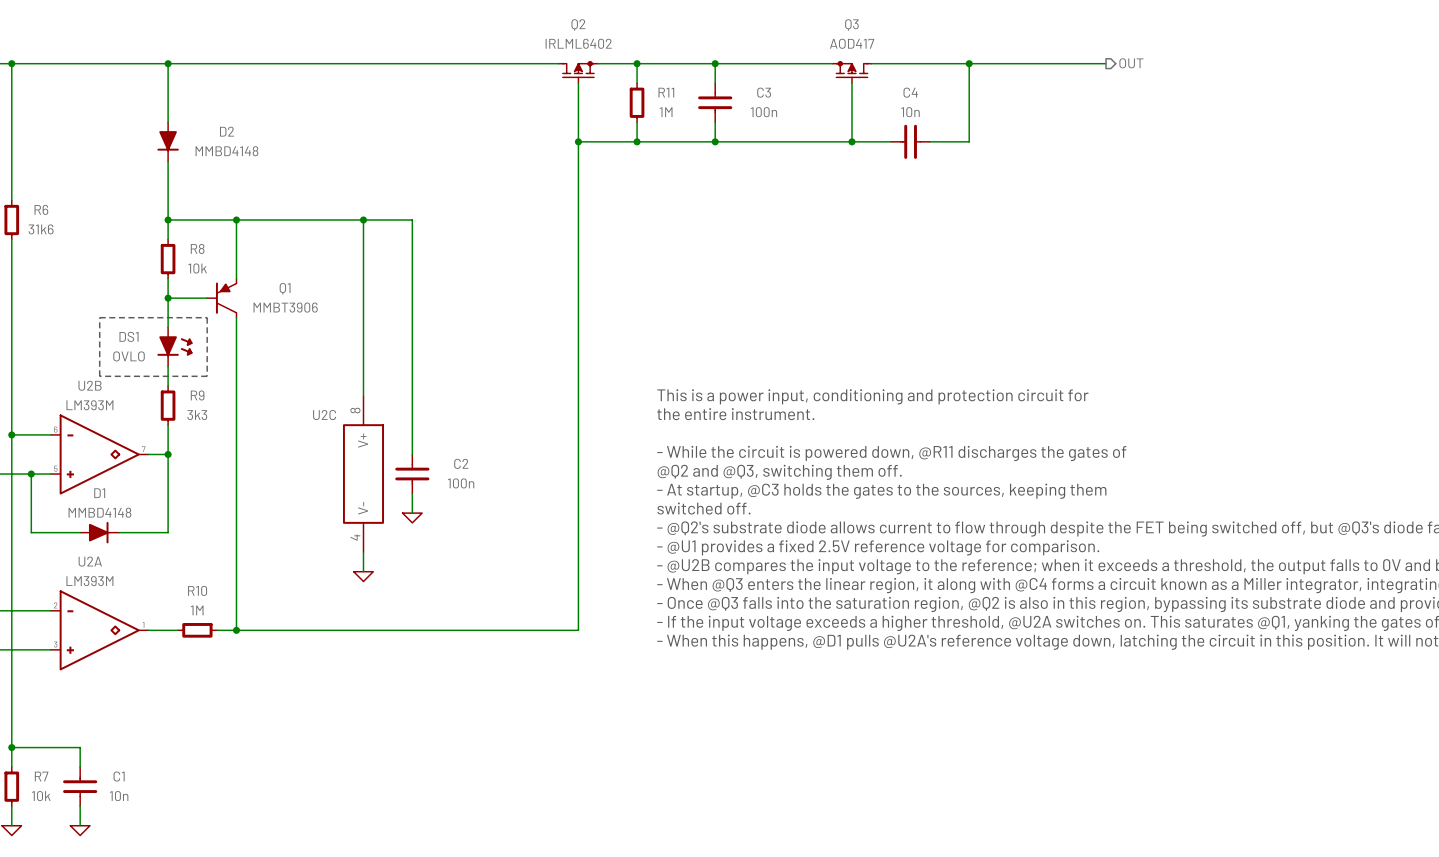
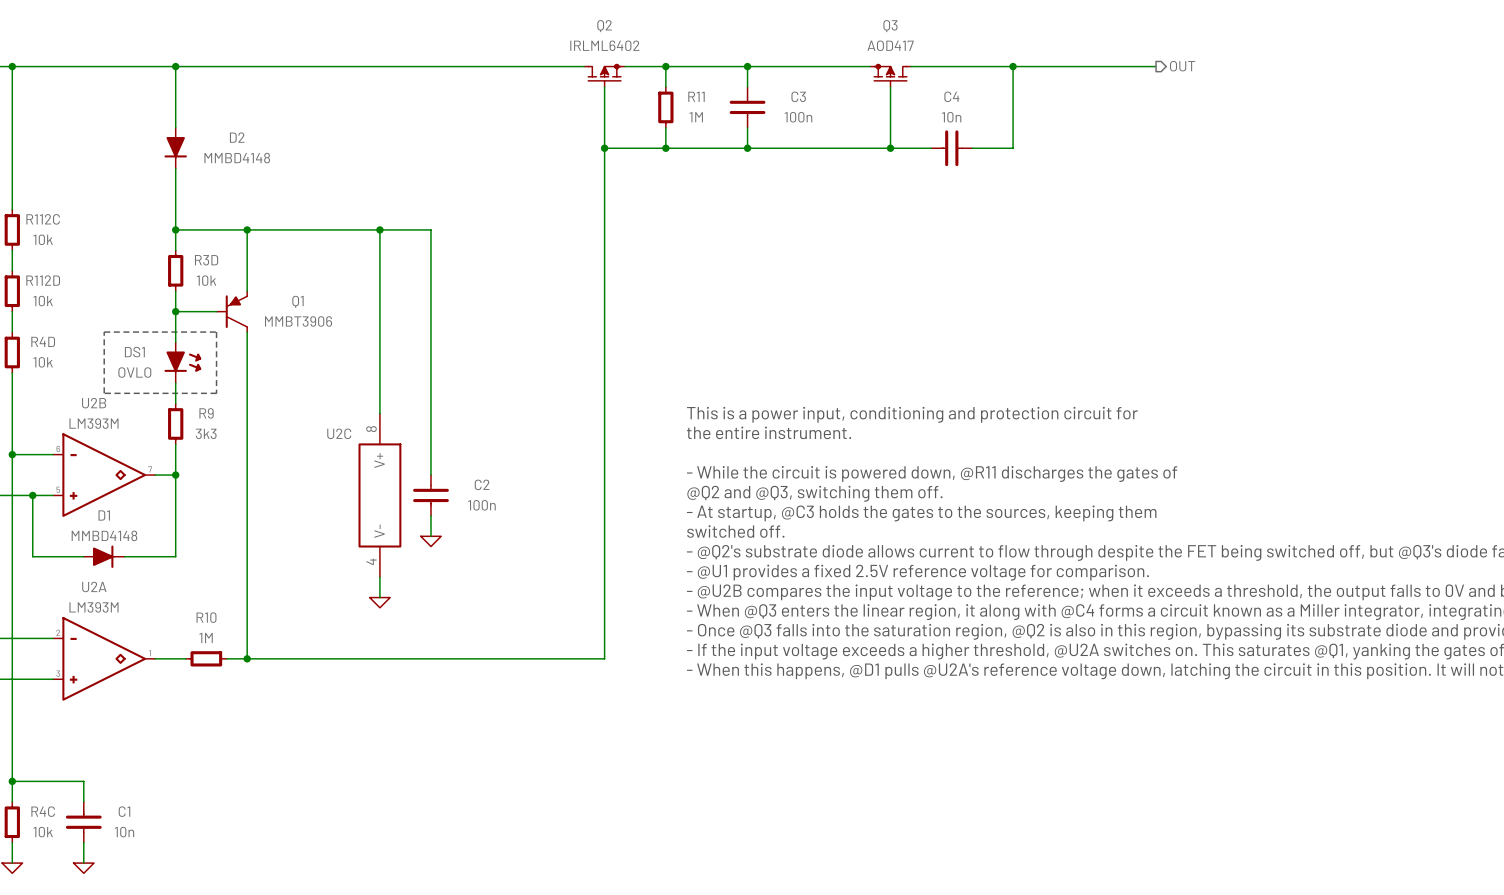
R6 name: R6 (41, 209) -> R112C (43, 219)
R6 value: 31k6 (41, 229) -> 10k (43, 239)
wire: (11, 259) (11, 298) -> none
R8: 10k (168, 259) -> none
R3D: none -> 10k (175, 270)
R112D: none -> 10k (12, 291)
wire: (11, 317) (11, 356) -> none
R4D: none -> 10k (12, 352)
R7: 10k (11, 786) -> none
R4C: none -> 10k (12, 822)

